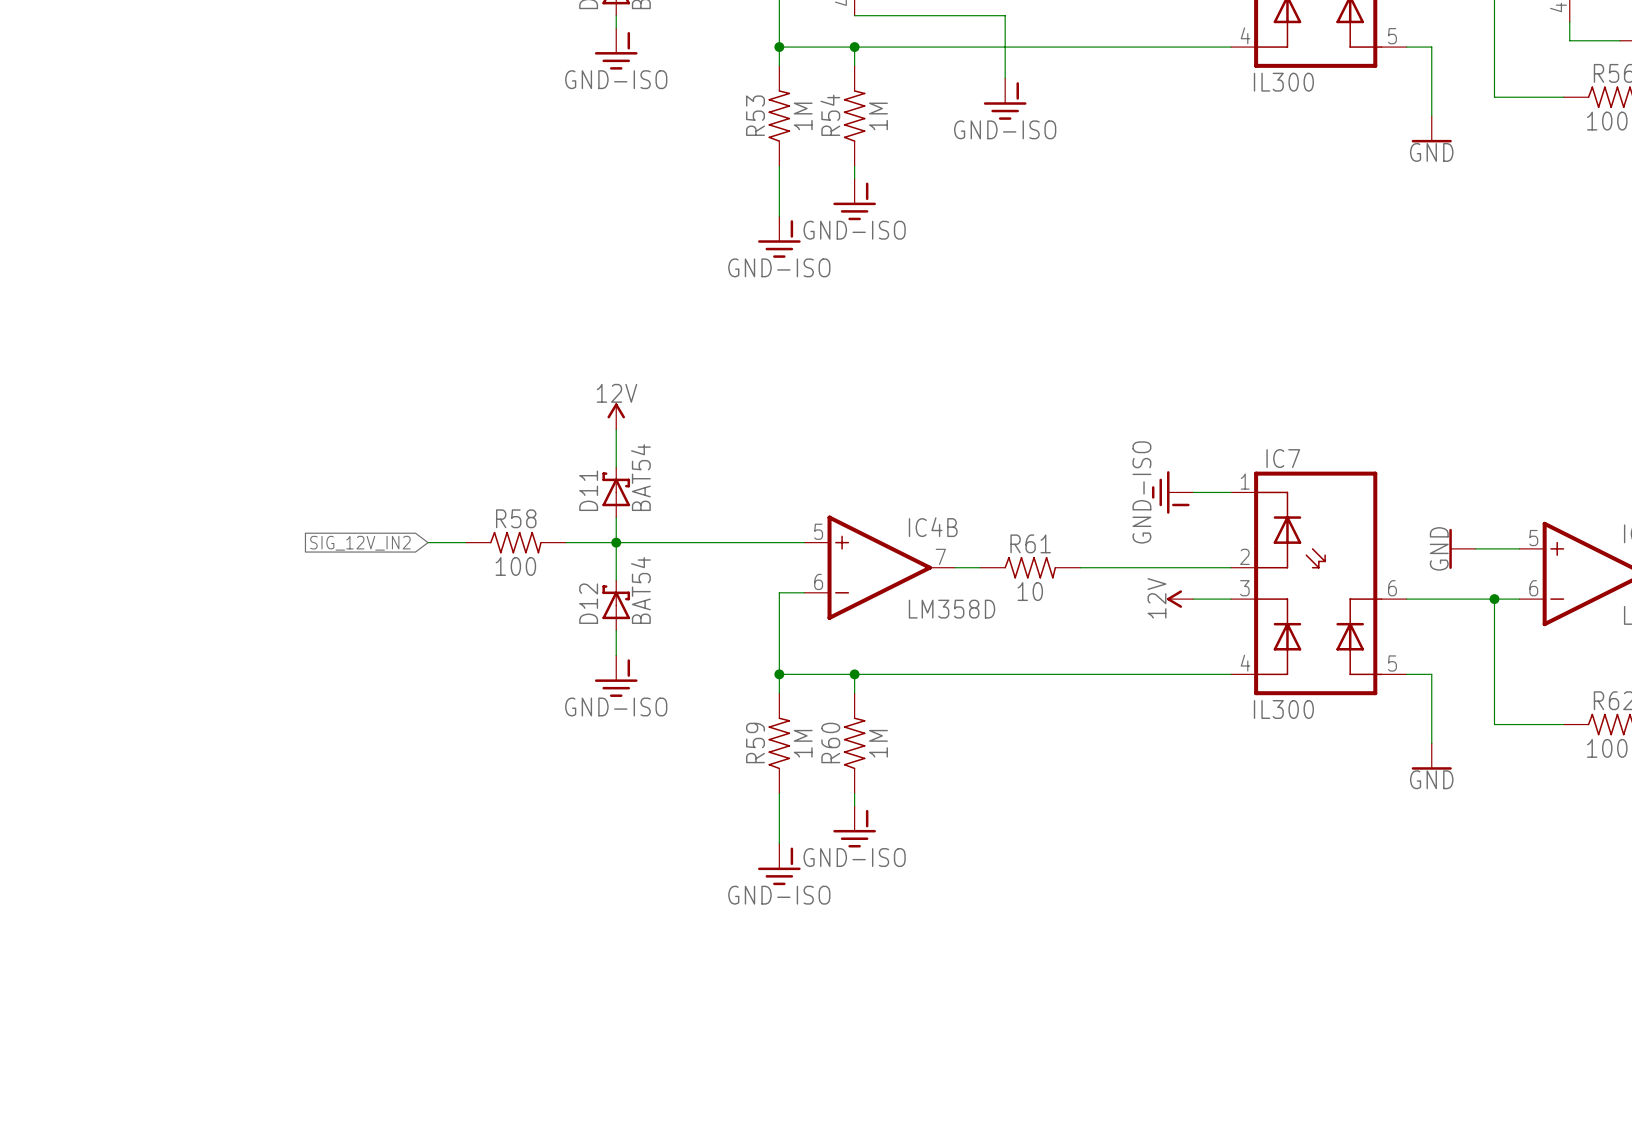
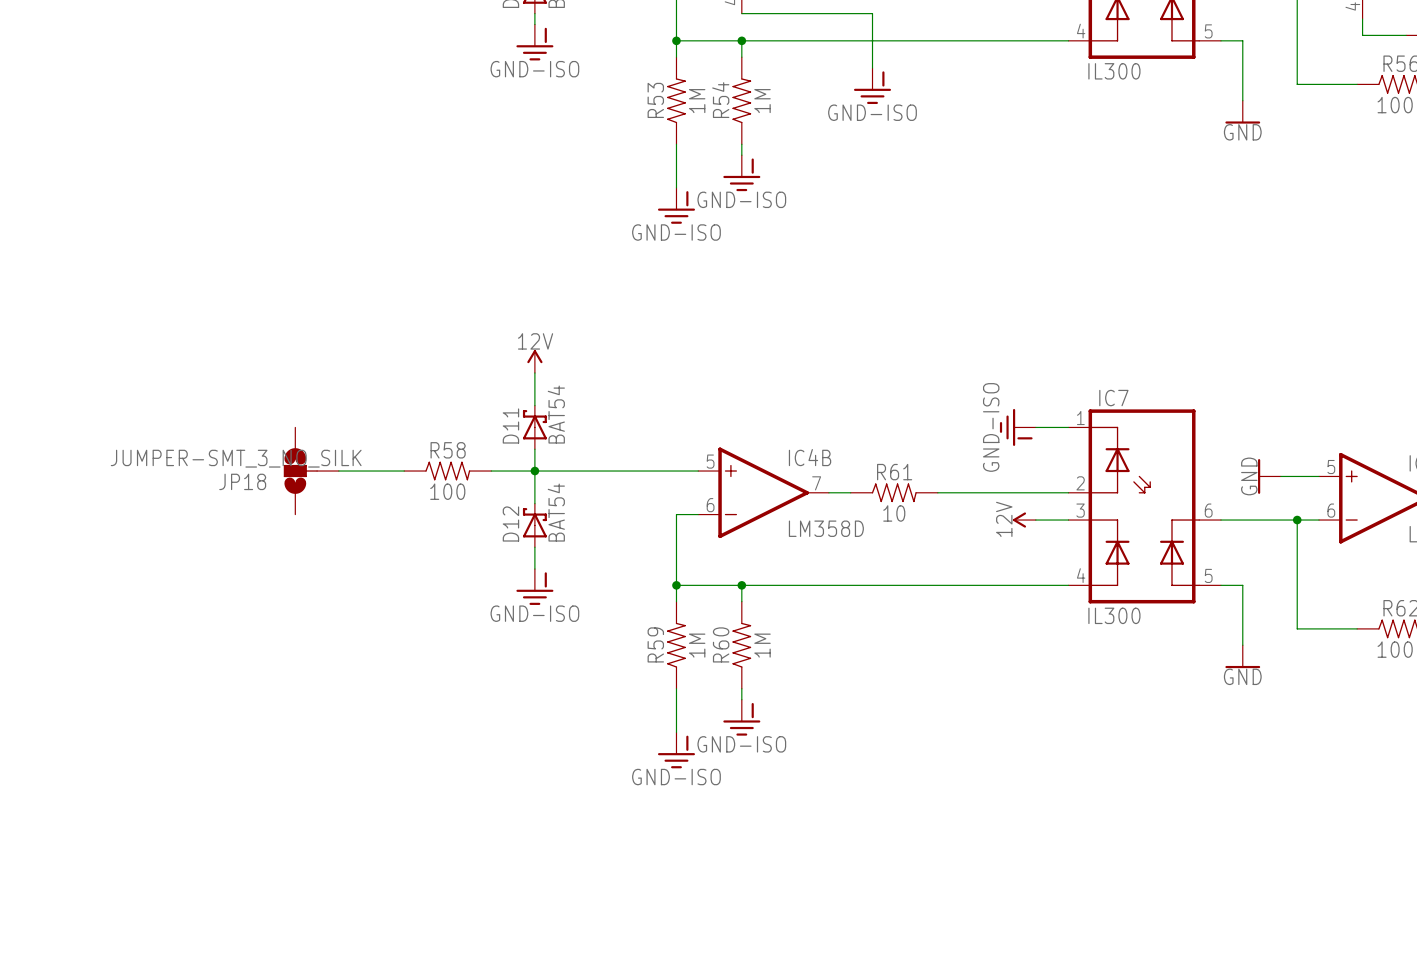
JP18: none -> JUMPER-SMT_3_NO_SILK (311, 471)
wire: none -> (338, 471) (371, 471)
global label: SIG_12V_IN2 (360, 543) -> none

